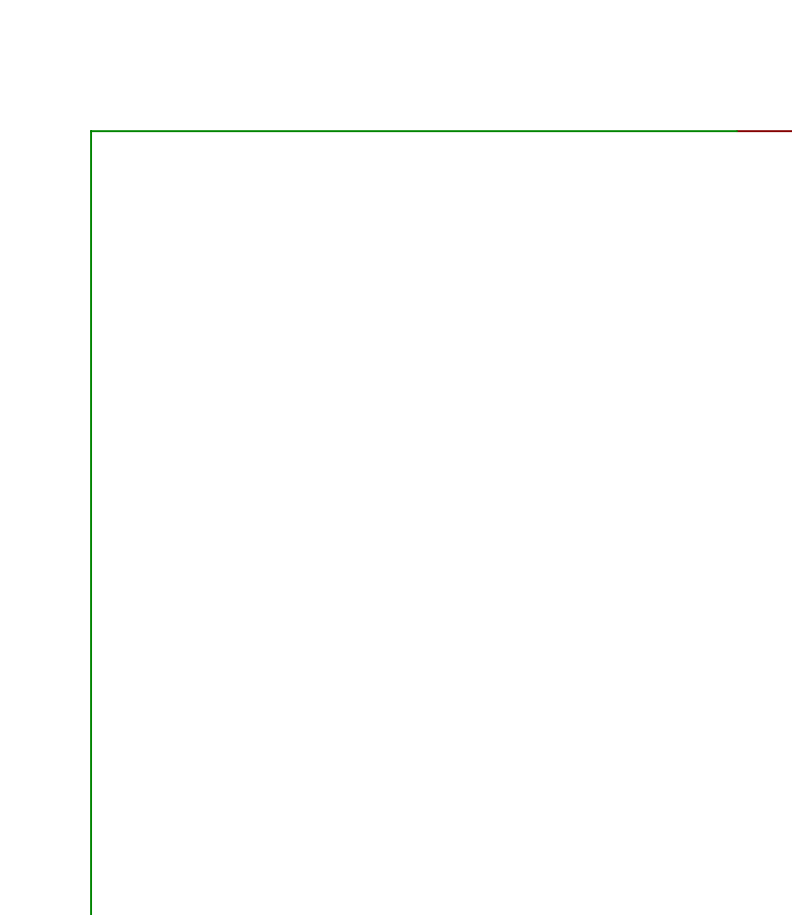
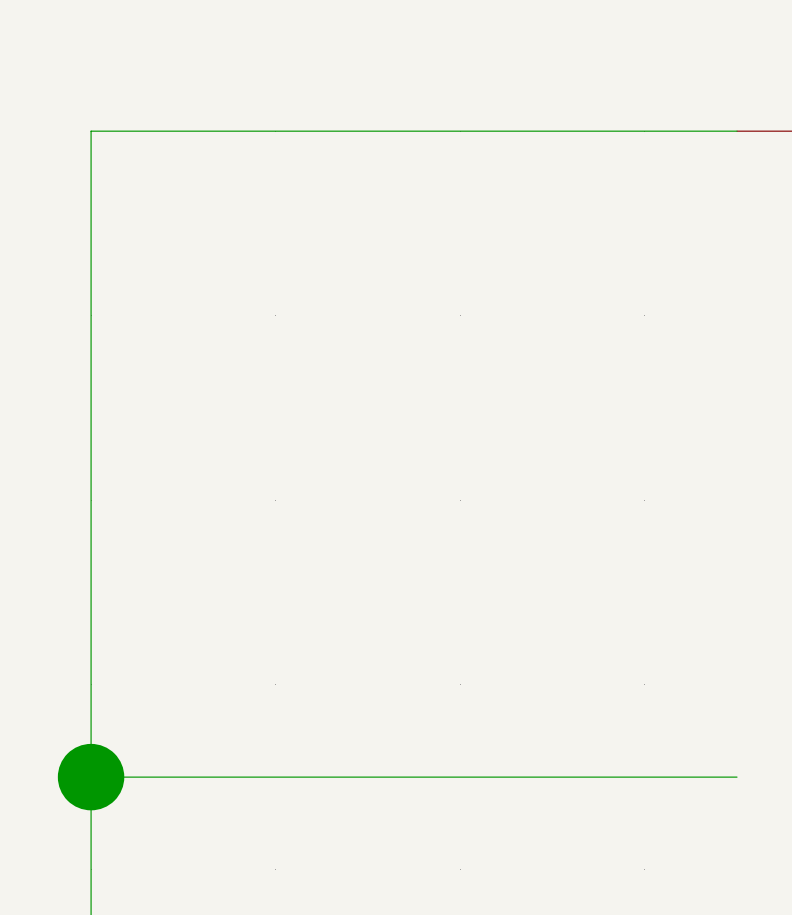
wire: none -> (91, 777) (737, 777)
junction: none -> (91, 777)

